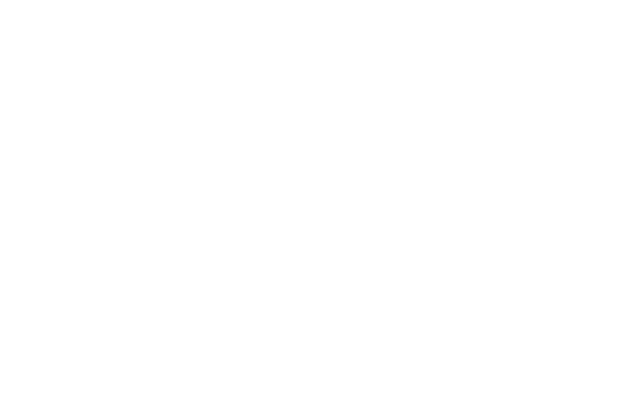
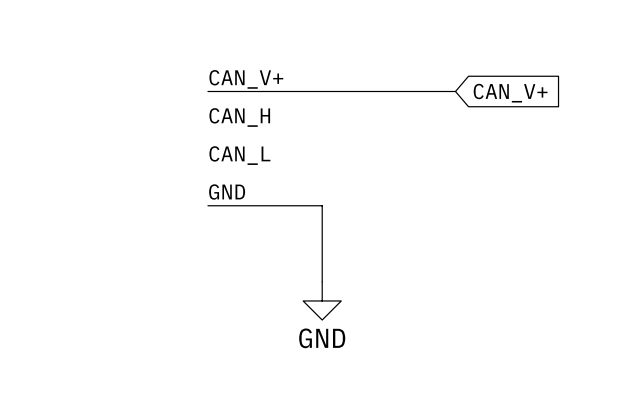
label: none -> CAN_V+ (246, 79)
wire: none -> (207, 91) (455, 91)
global label: none -> CAN_V+ (510, 93)
label: none -> CAN_H (239, 117)
label: none -> CAN_L (239, 155)
label: none -> GND (227, 192)
wire: none -> (207, 205) (322, 205) (322, 281)
power symbol: none -> GND (322, 300)

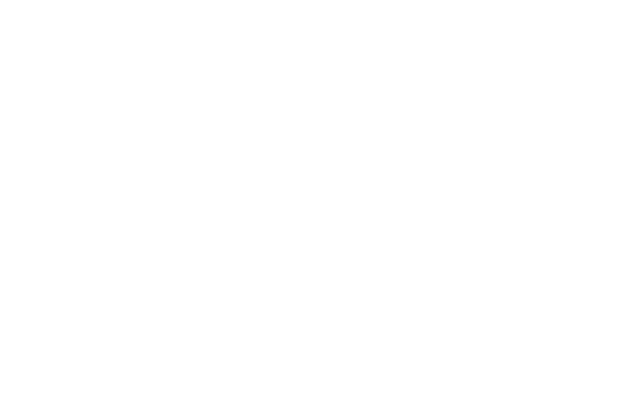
label: CAN_V+ (246, 79) -> none
wire: (207, 91) (455, 91) -> none
global label: CAN_V+ (510, 93) -> none
label: CAN_H (239, 117) -> none
label: CAN_L (239, 155) -> none
label: GND (227, 192) -> none
wire: (207, 205) (322, 205) (322, 281) -> none
power symbol: GND (322, 300) -> none

